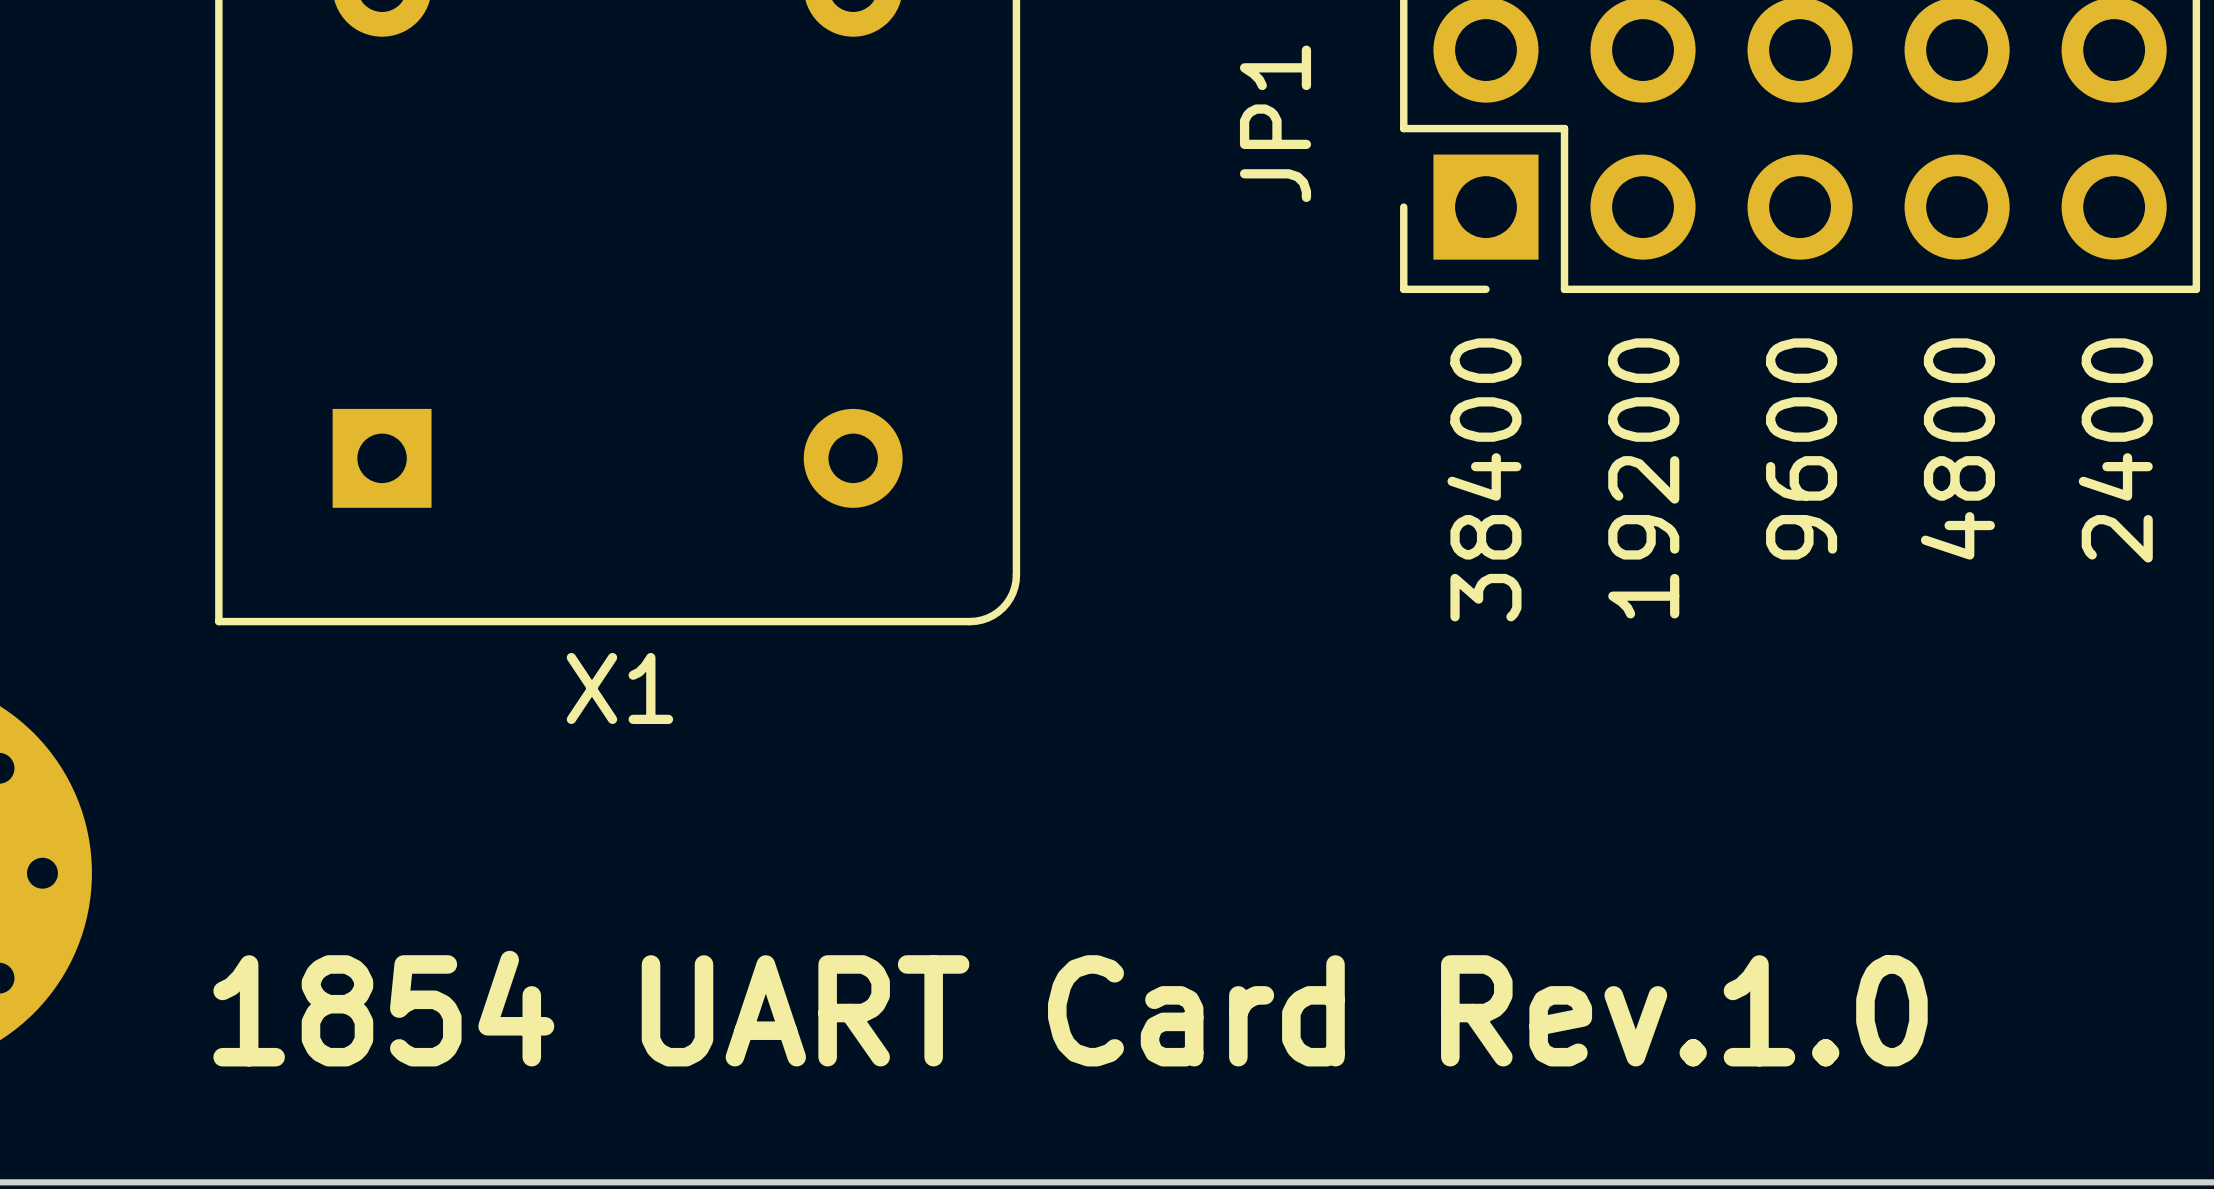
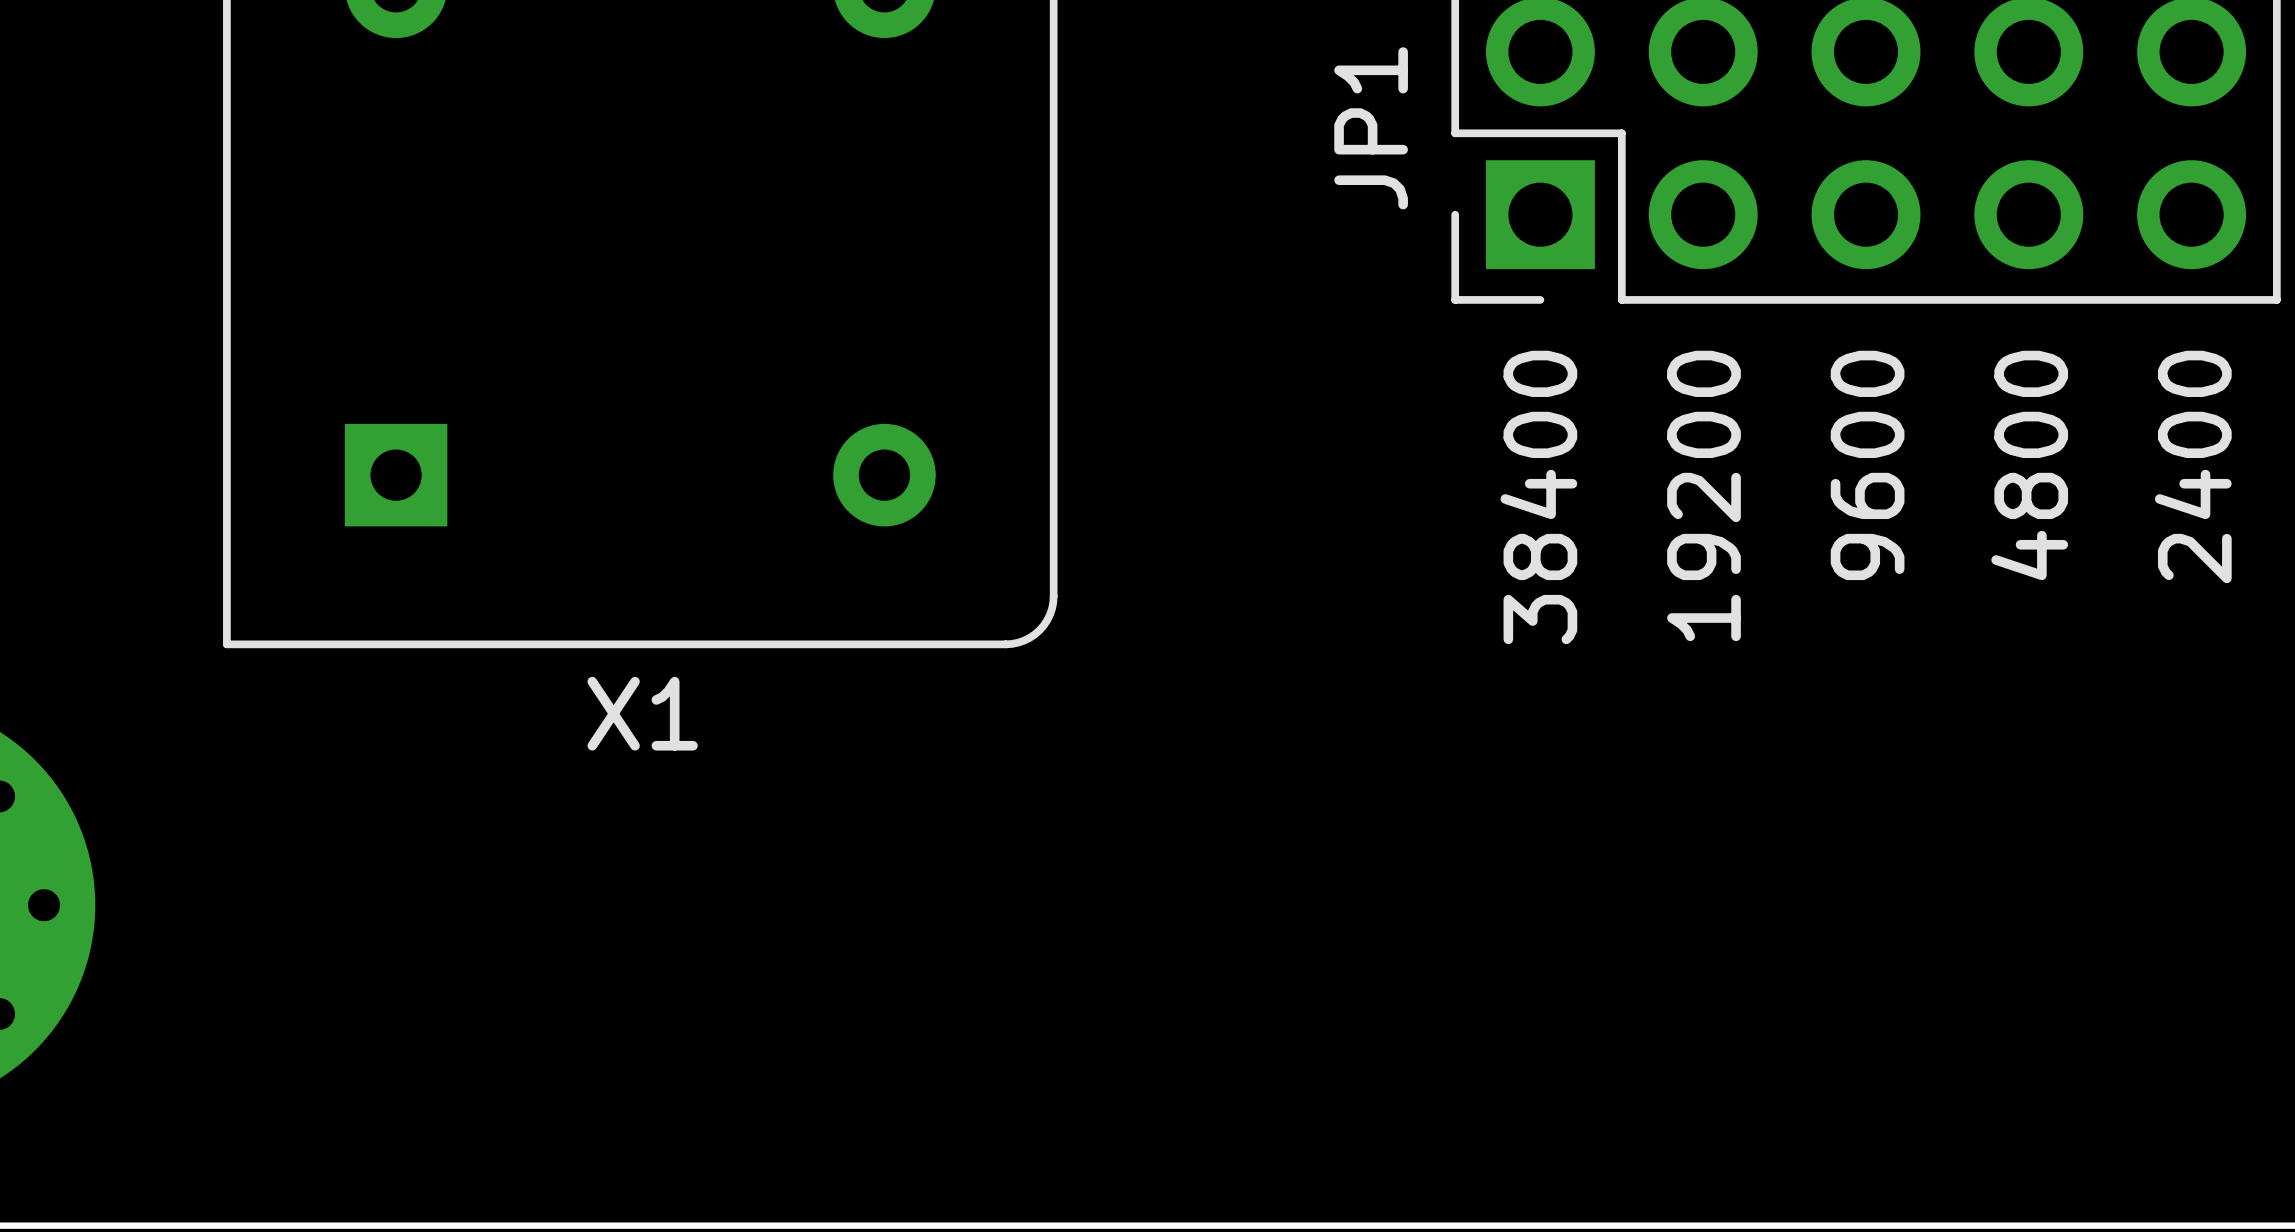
JP1 name position: JP1 (1275, 123) -> JP1 (1371, 128)
text: 1854 UART Card Rev.1.0 (1070, 1008) -> none

